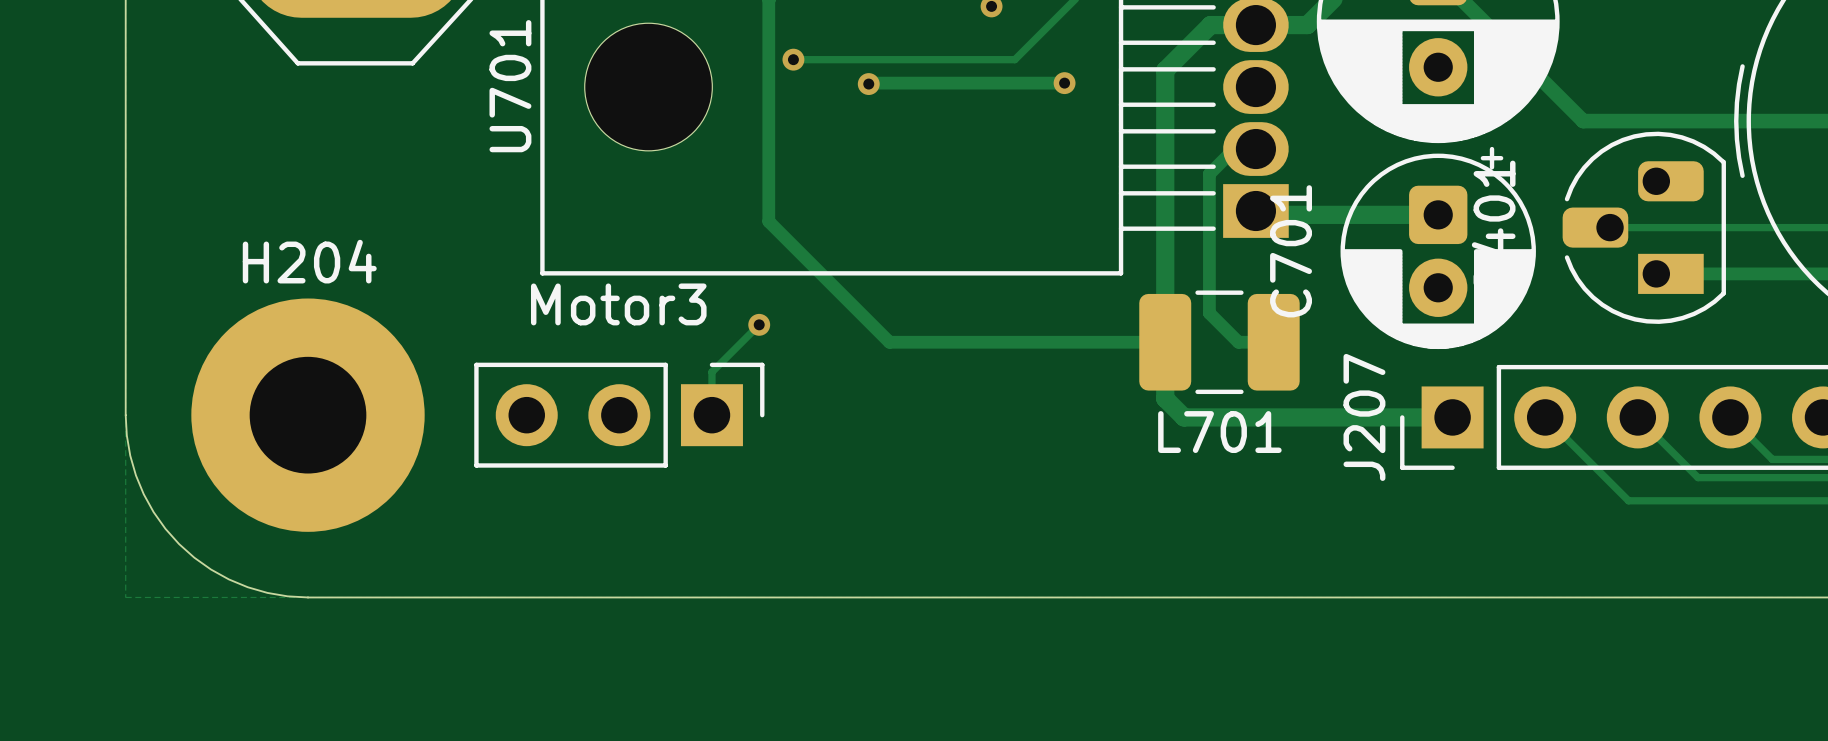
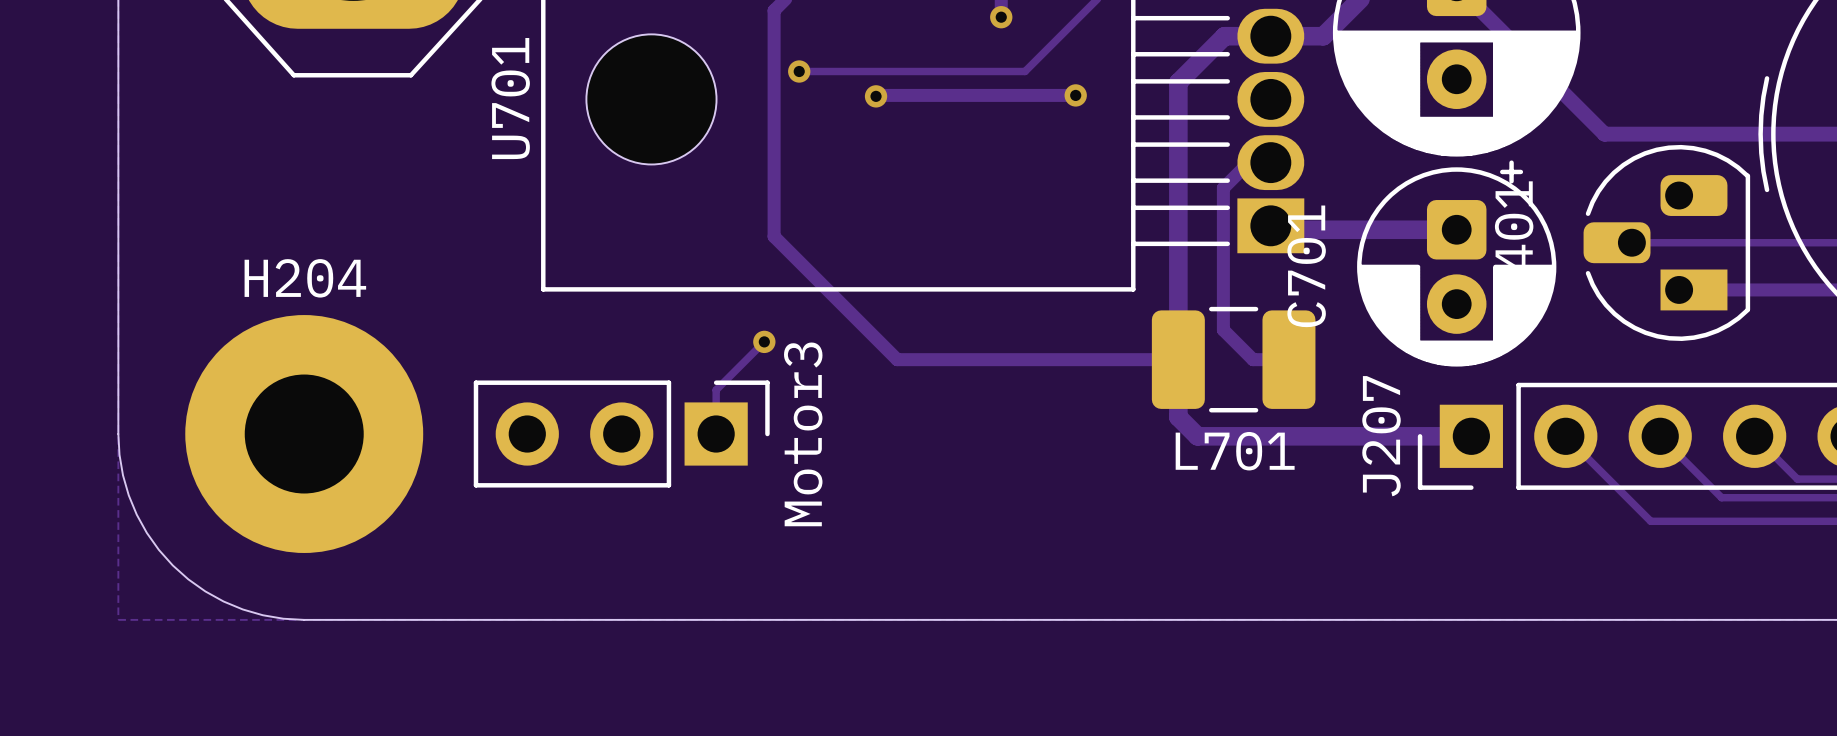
Motor3 name rotation: 0° (618, 304) -> 90° counterclockwise (803, 434)

